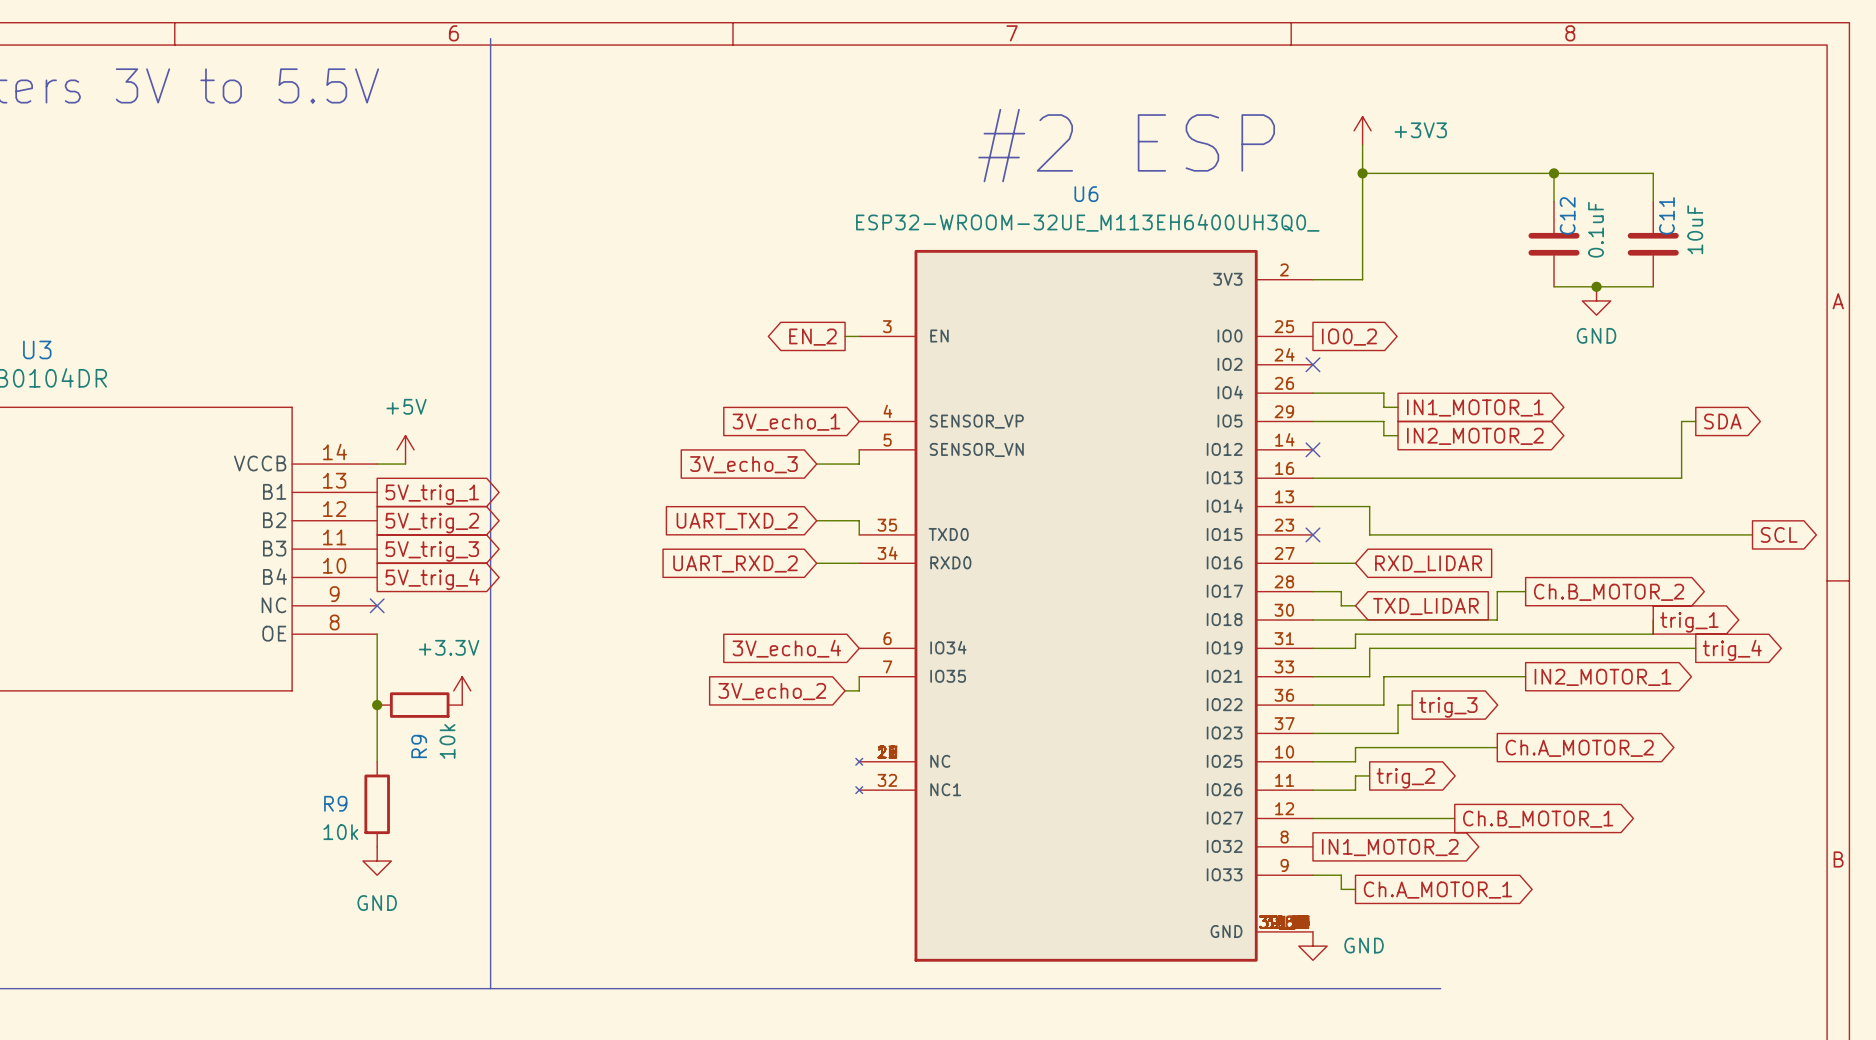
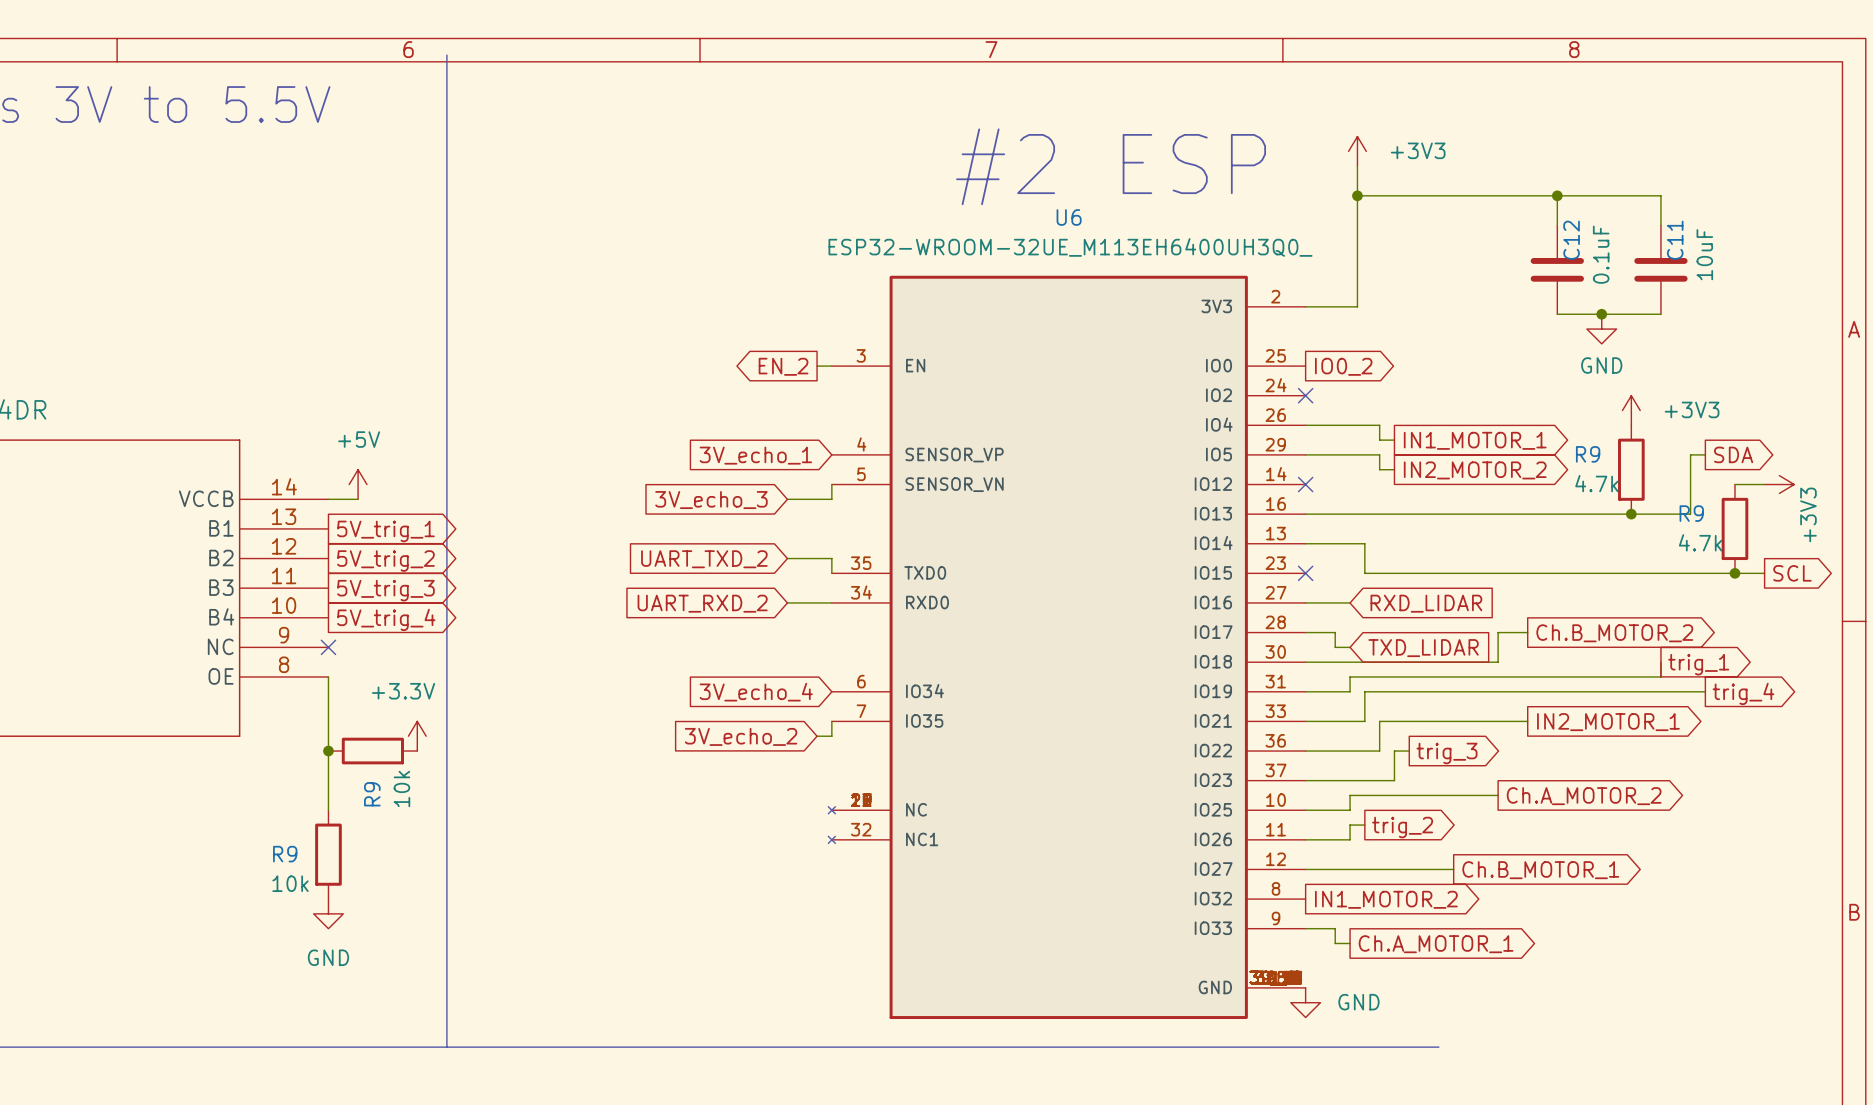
power symbol: none -> +3V3 (1631, 410)
R9: none -> 4.7k (1631, 469)
wire: none -> (1734, 484) (1764, 484)
power symbol: none -> +3V3 (1779, 484)
junction: none -> (1631, 514)
R9: none -> 4.7k (1734, 528)
junction: none -> (1734, 573)

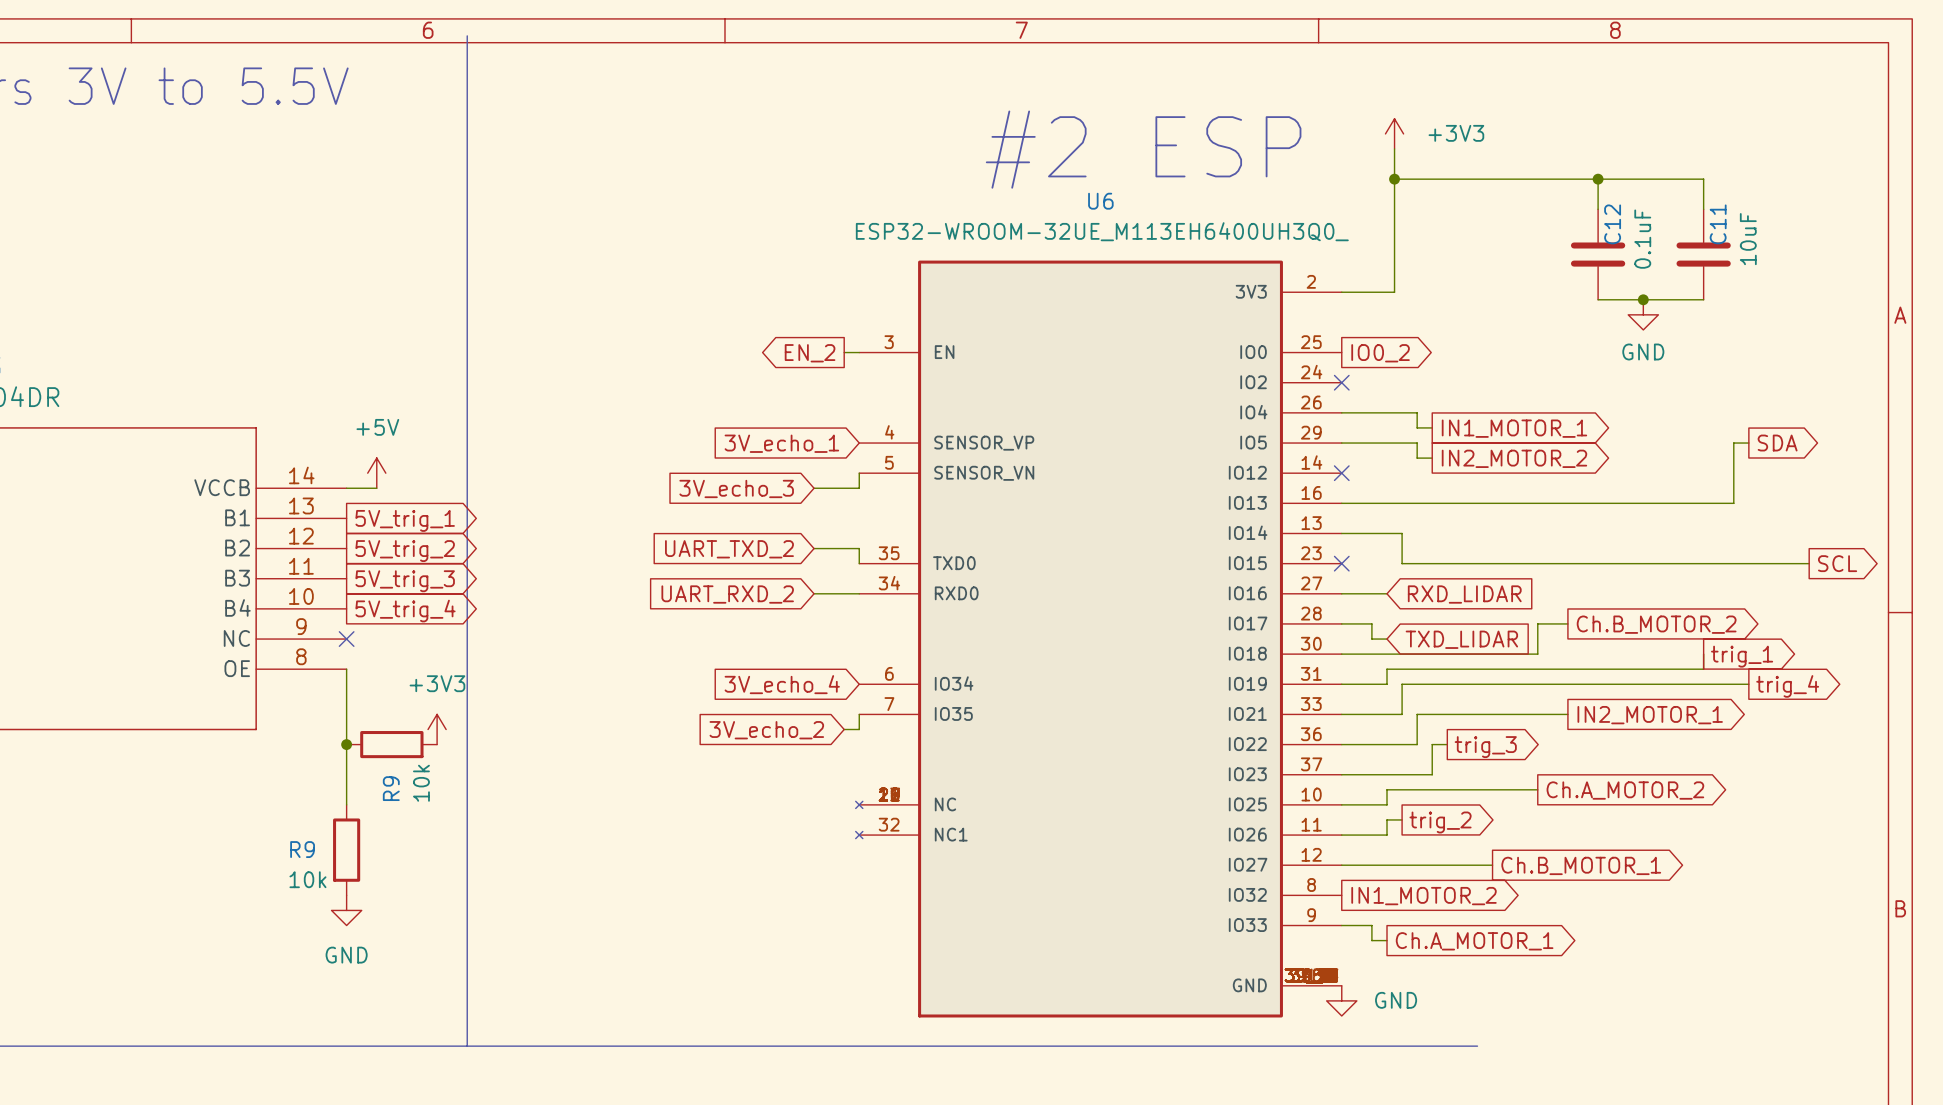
power symbol: +3V3 (1631, 410) -> none
R9: 4.7k (1631, 469) -> none
wire: (1734, 484) (1764, 484) -> none
power symbol: +3V3 (1779, 484) -> none
junction: (1631, 514) -> none
R9: 4.7k (1734, 528) -> none
junction: (1734, 573) -> none
power symbol: +3.3V (417, 736) -> +3V3 (437, 729)

